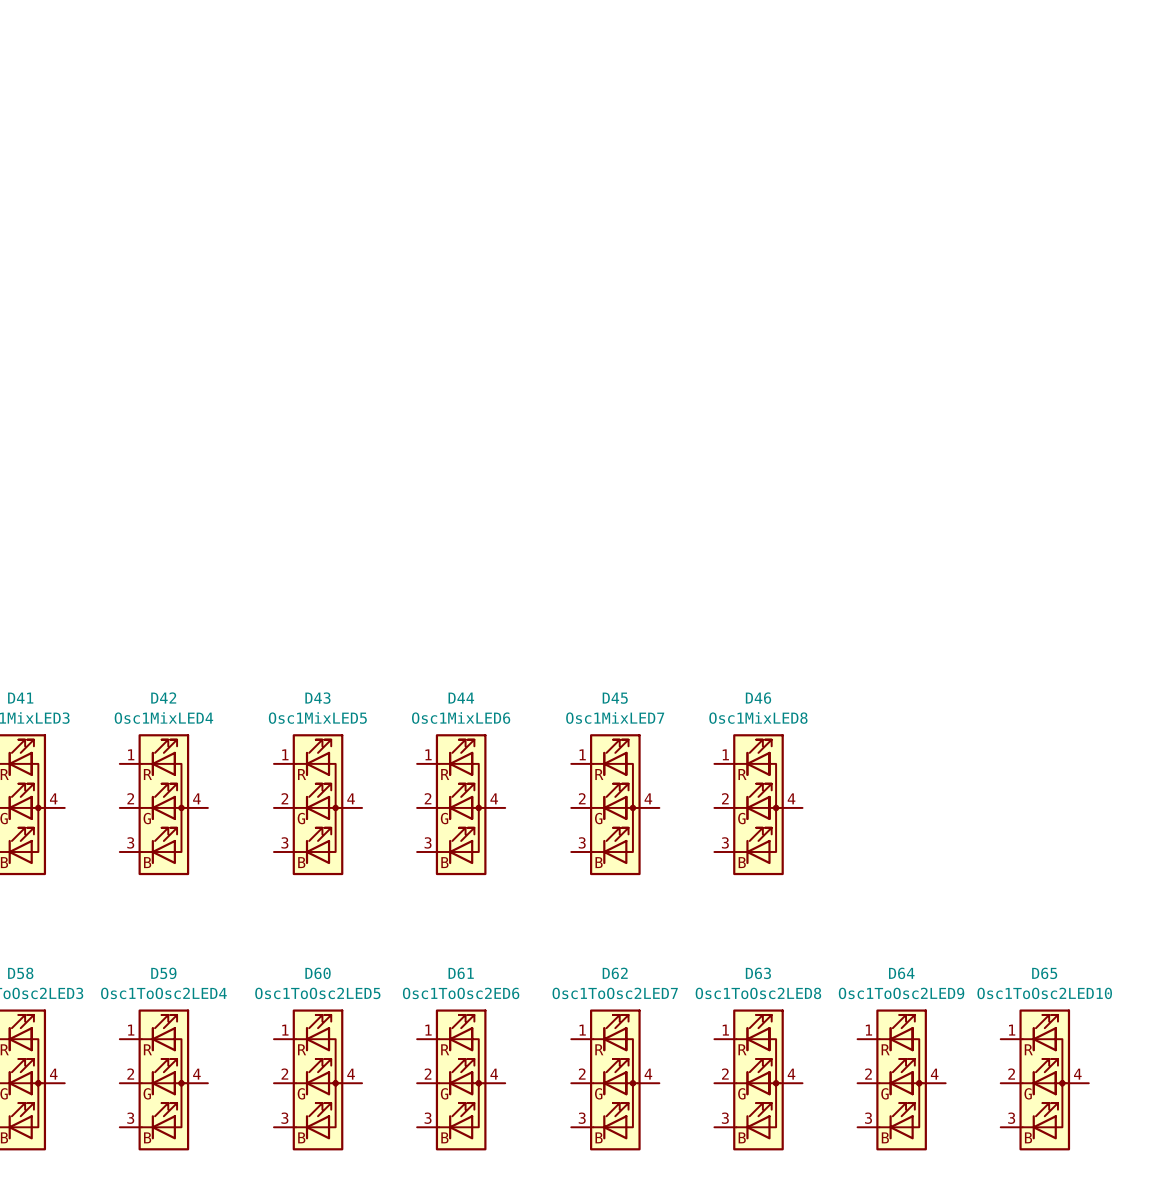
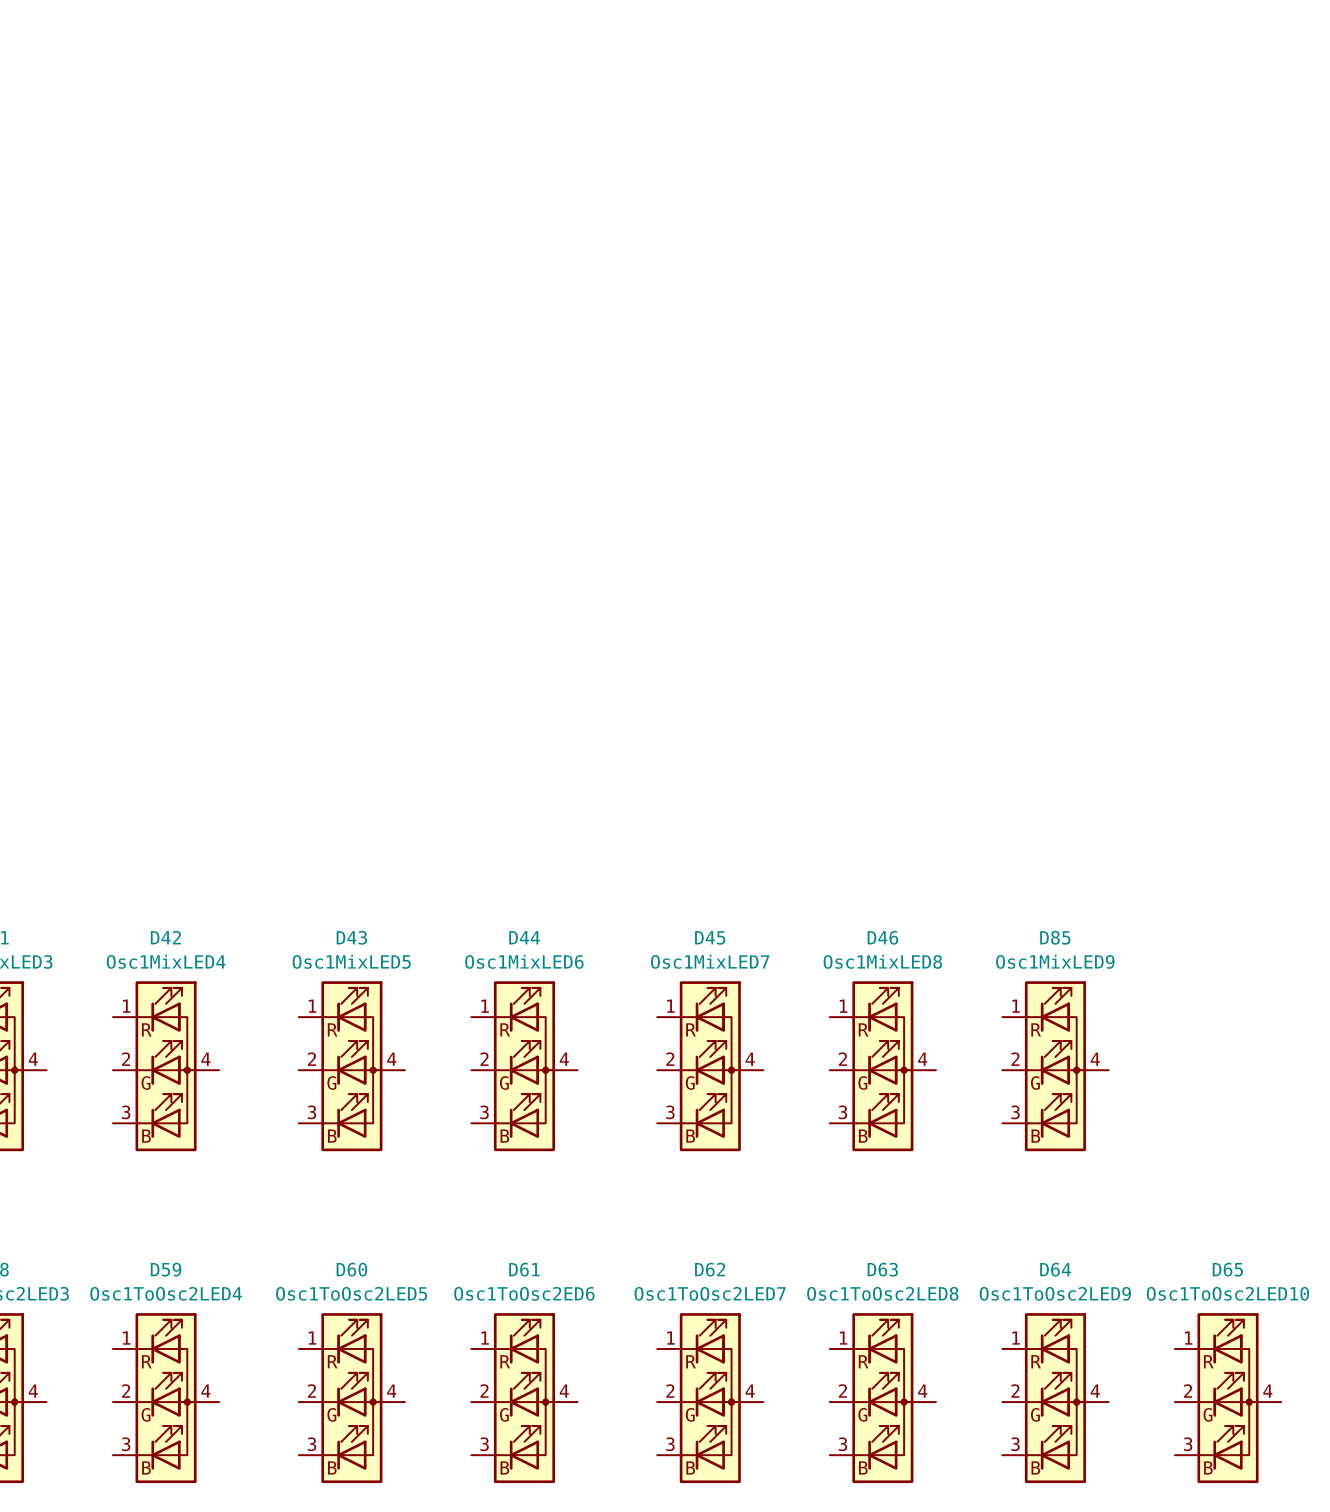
D85: none -> Osc1MixLED9 (1055, 1066)

